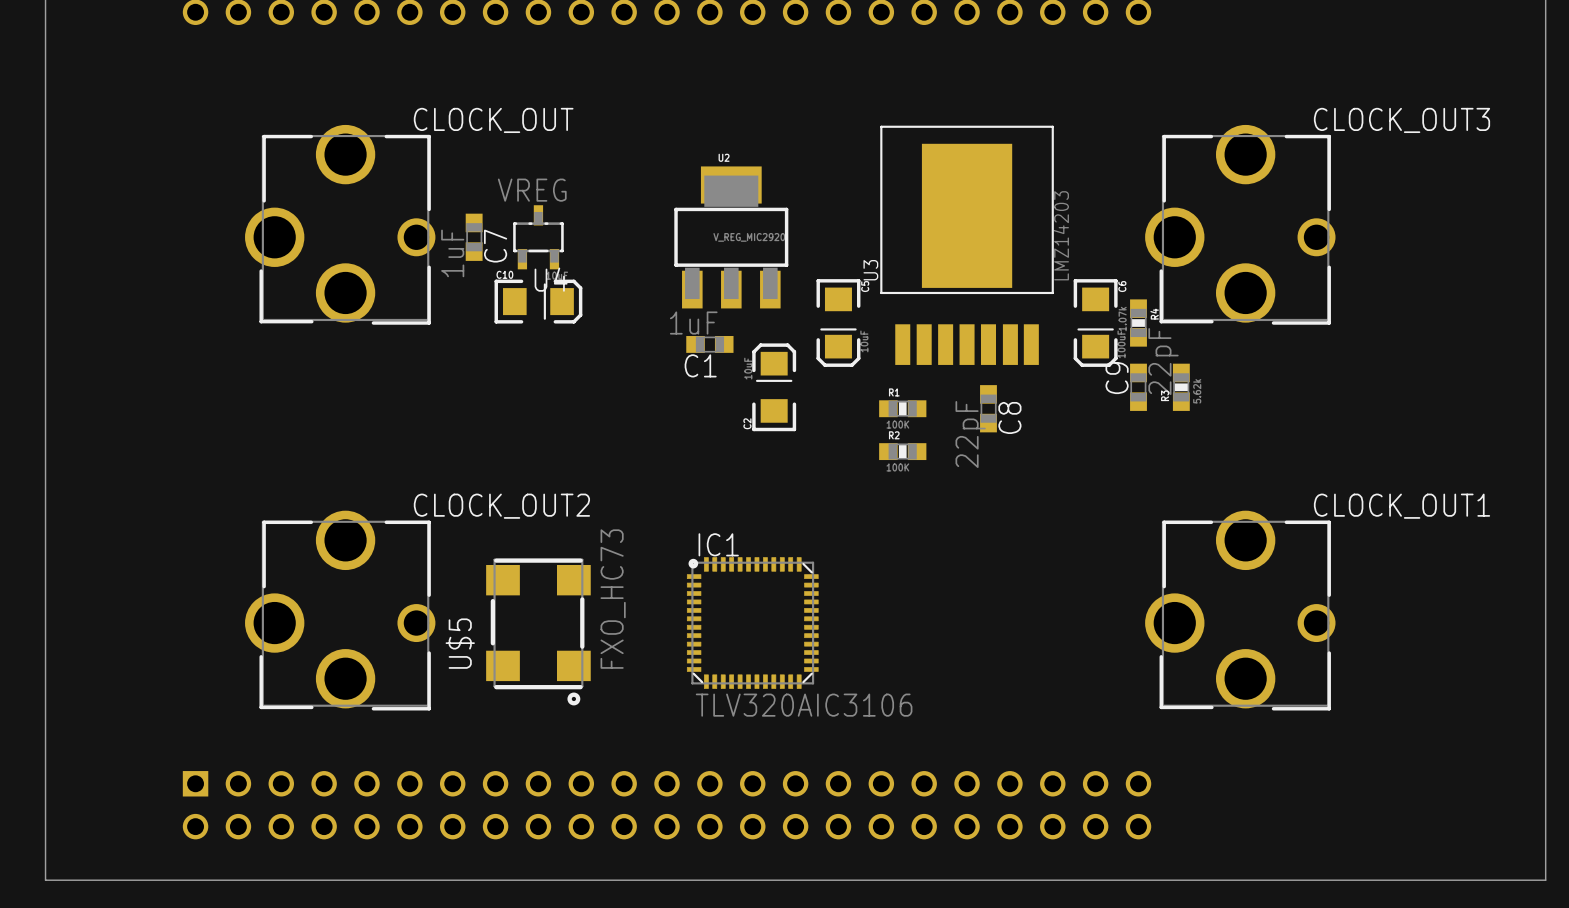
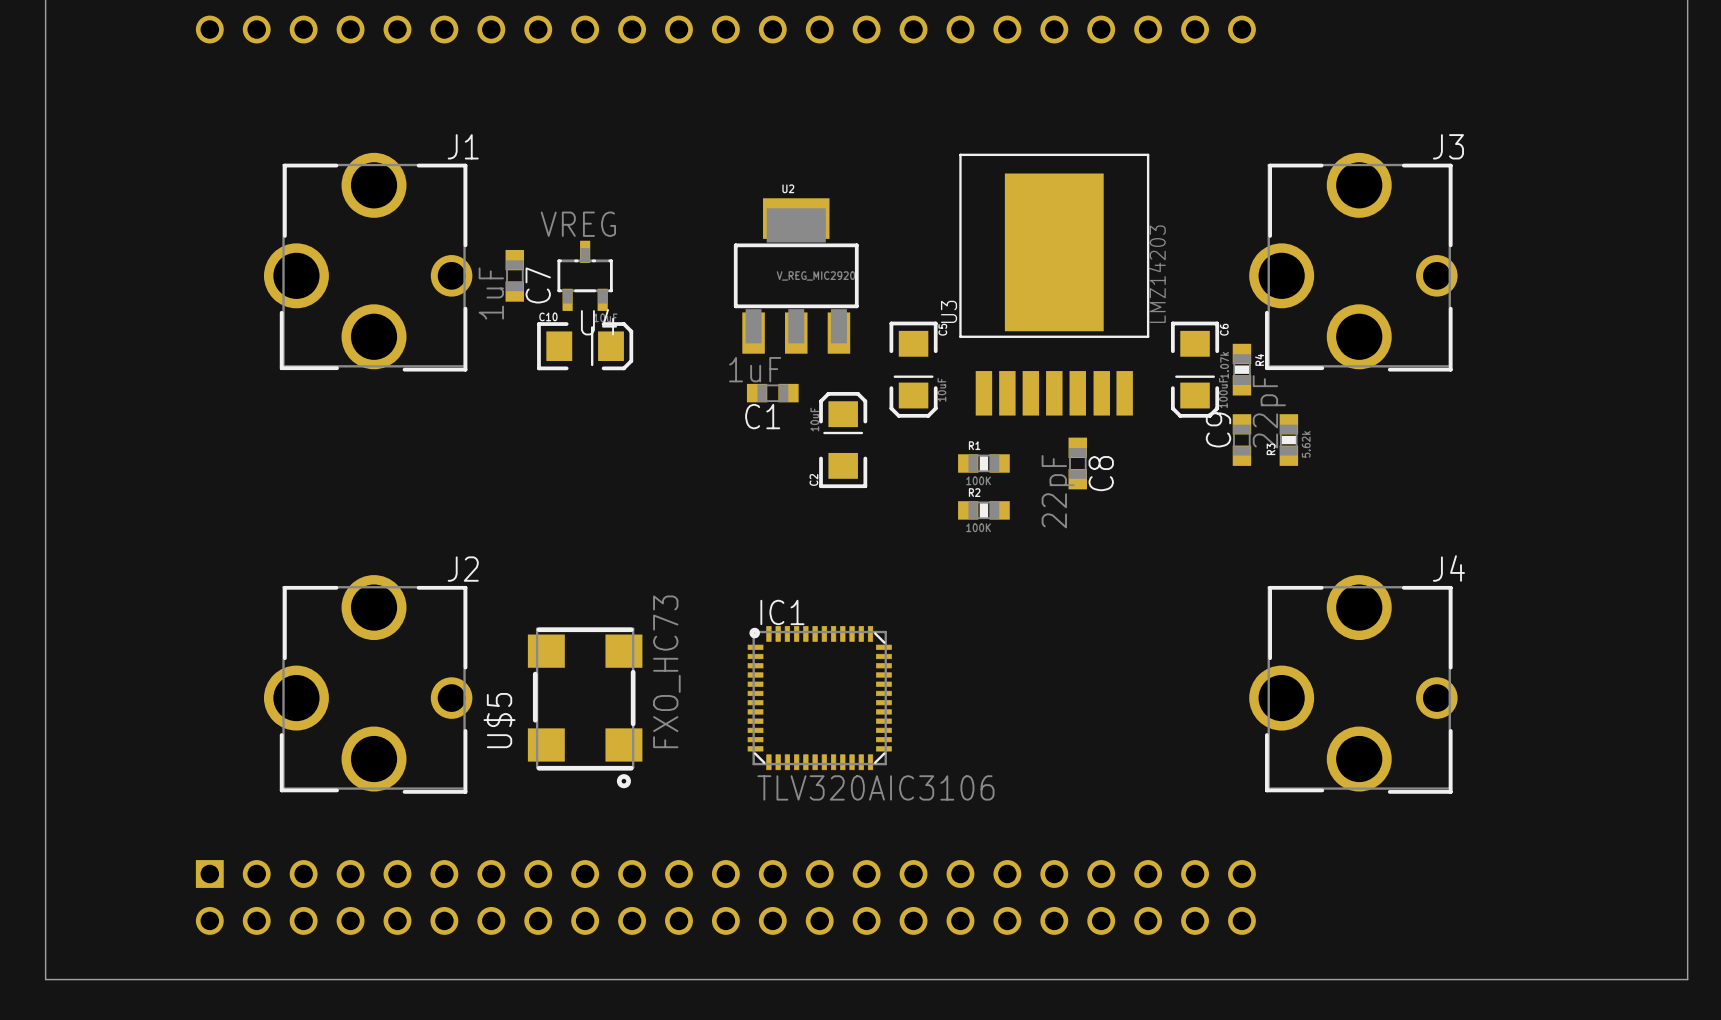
CLOCK_OUT name: CLOCK_OUT (493, 120) -> J1 (463, 146)
CLOCK_OUT3 name: CLOCK_OUT3 (1402, 120) -> J3 (1448, 146)
CLOCK_OUT2 name: CLOCK_OUT2 (501, 506) -> J2 (463, 569)
CLOCK_OUT1 name: CLOCK_OUT1 (1402, 506) -> J4 (1448, 568)

